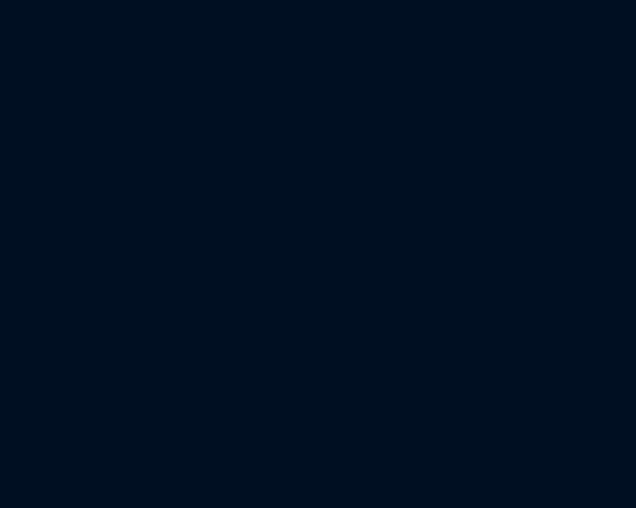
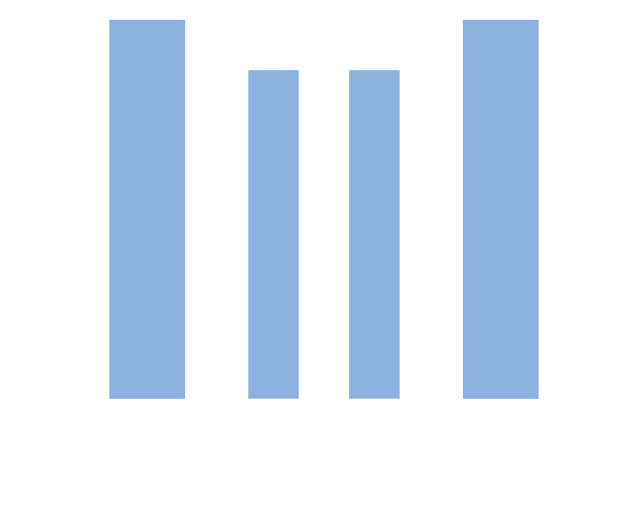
part: none -> (323, 209)

